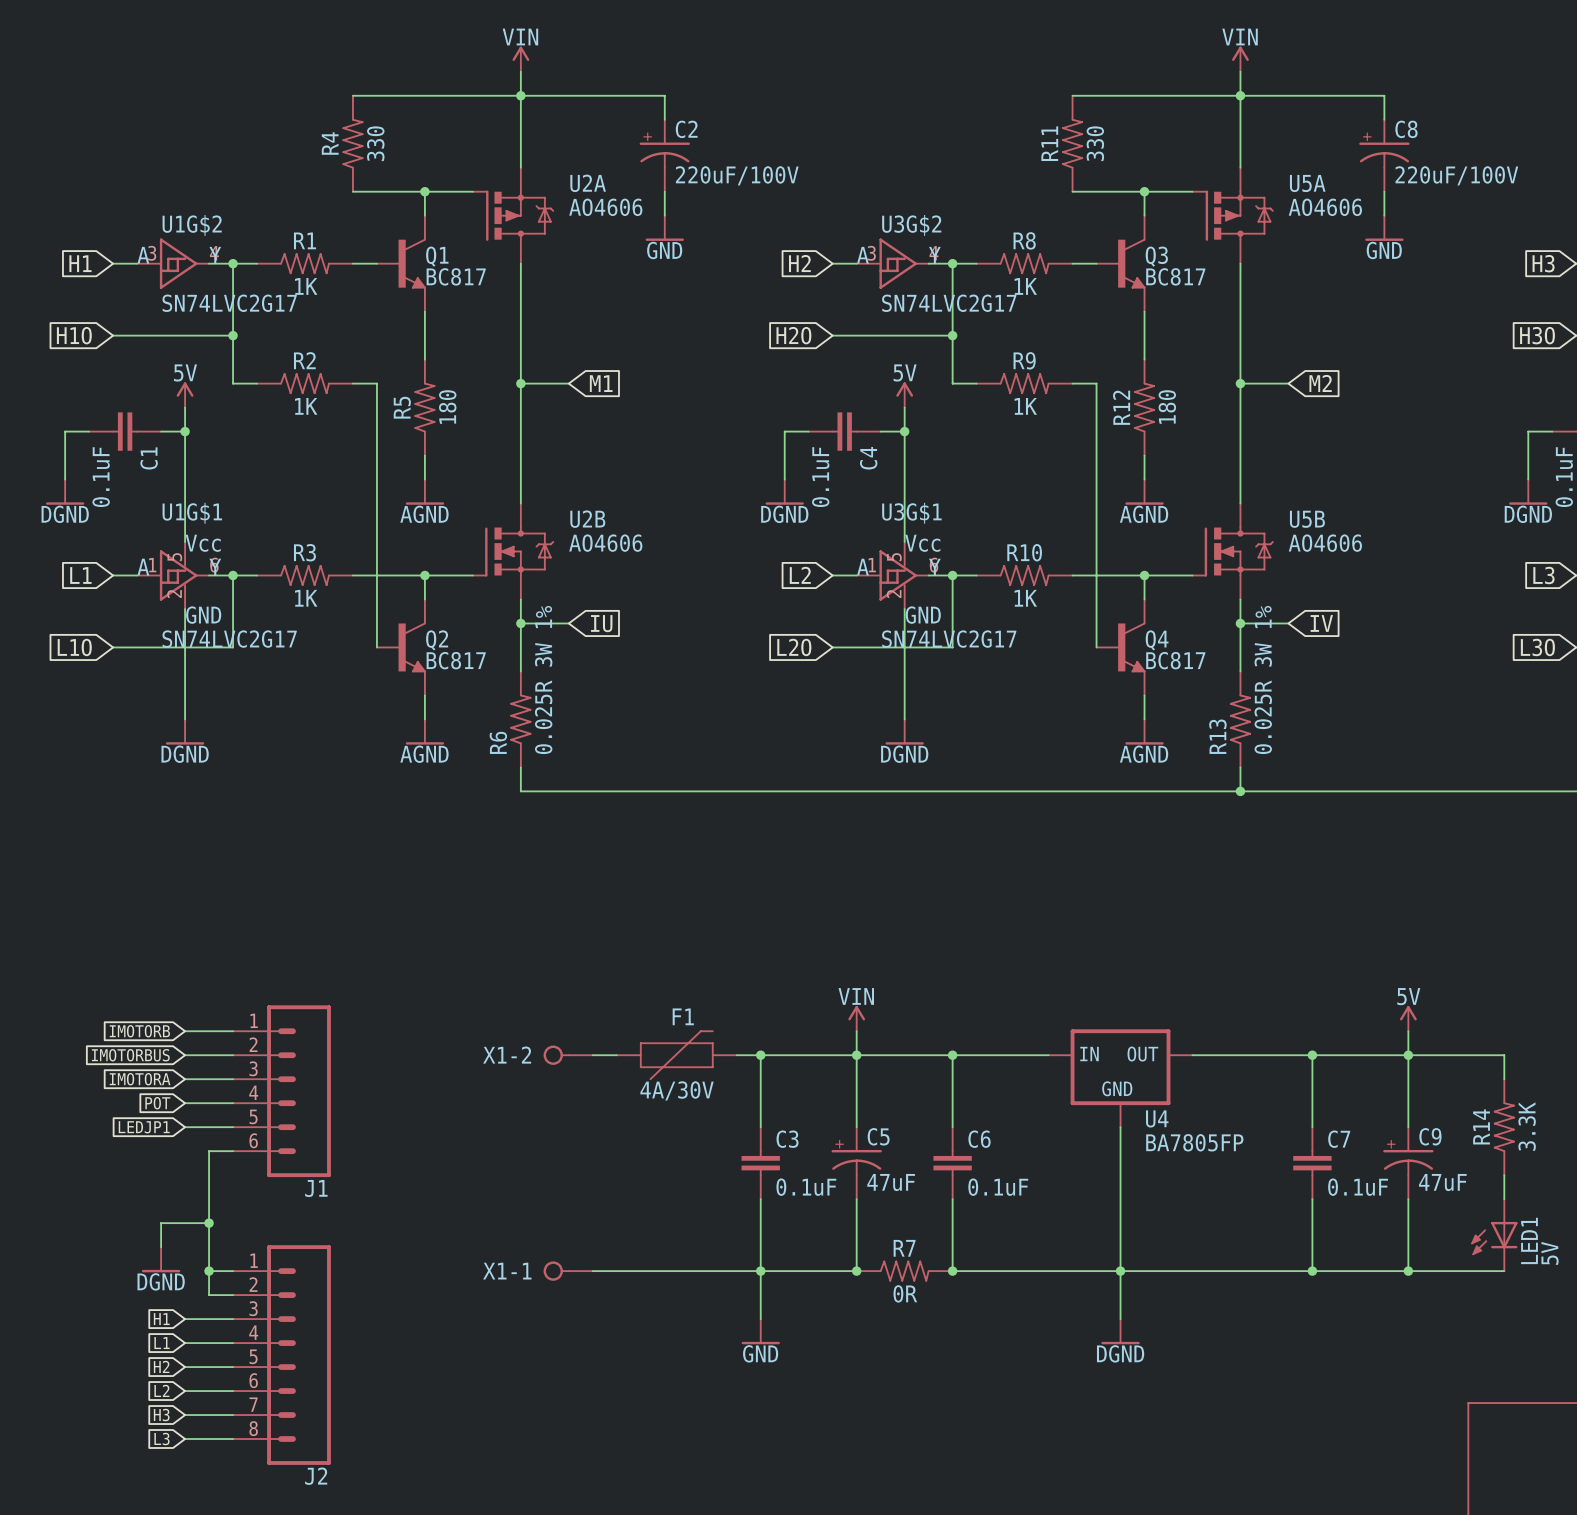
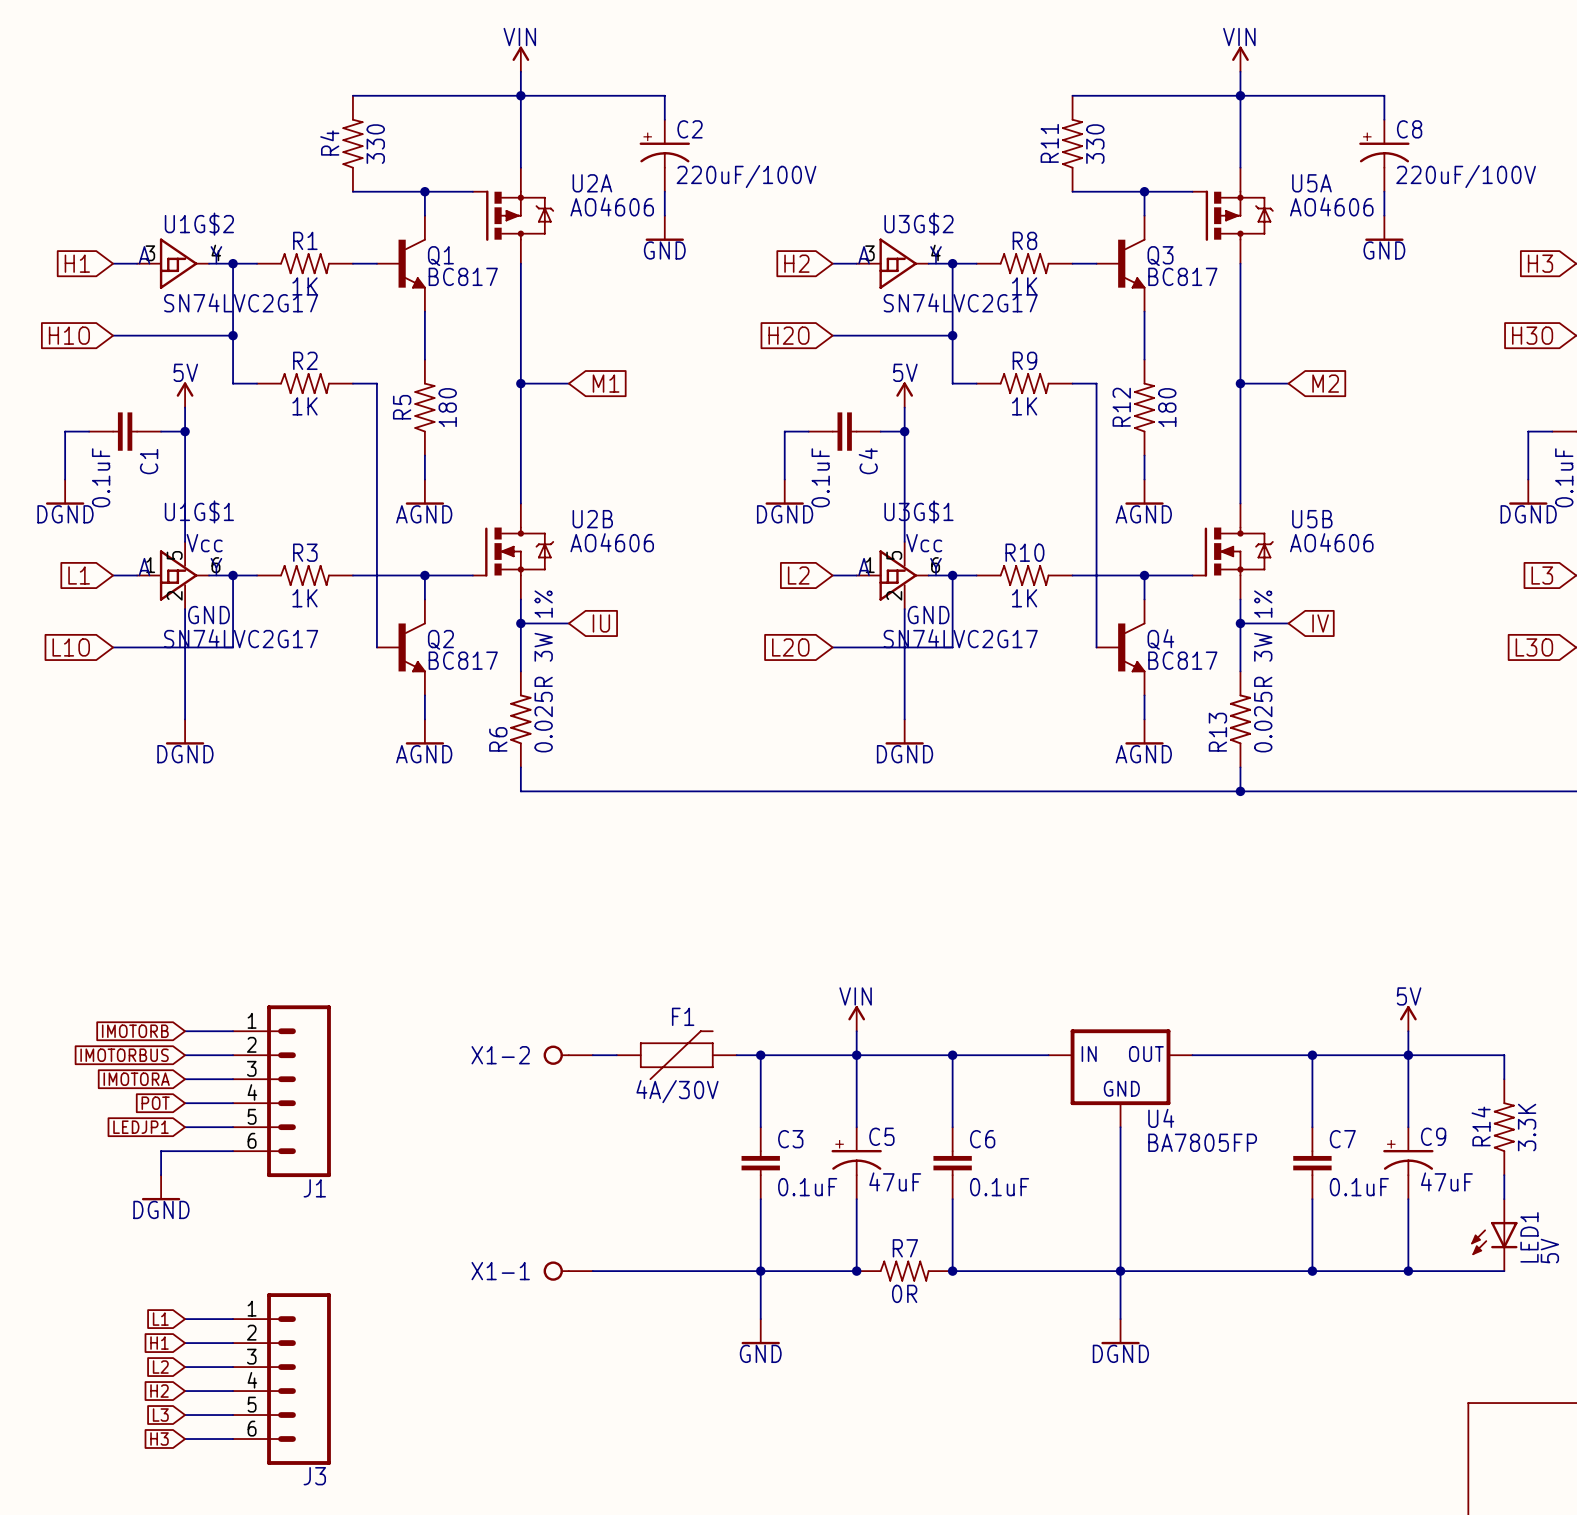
wire: (209, 1151) (209, 1295) (233, 1295) -> (209, 1151) (161, 1151) (161, 1175)
wire: (209, 1223) (161, 1223) (161, 1247) -> none
junction: (209, 1223) -> none
power symbol position: DGND (161, 1259) -> DGND (161, 1187)
wire: (209, 1271) (233, 1271) -> none
junction: (209, 1271) -> none
global label: H1 (161, 1319) -> L1 (160, 1319)
global label: L1 (162, 1343) -> H1 (159, 1343)
J2: (281, 1355) -> none
global label: H2 (161, 1366) -> L2 (160, 1367)
J3: none -> (281, 1379)
global label: L2 (161, 1390) -> H2 (159, 1391)
global label: H3 (161, 1415) -> L3 (160, 1415)
global label: L3 (161, 1439) -> H3 (159, 1439)

